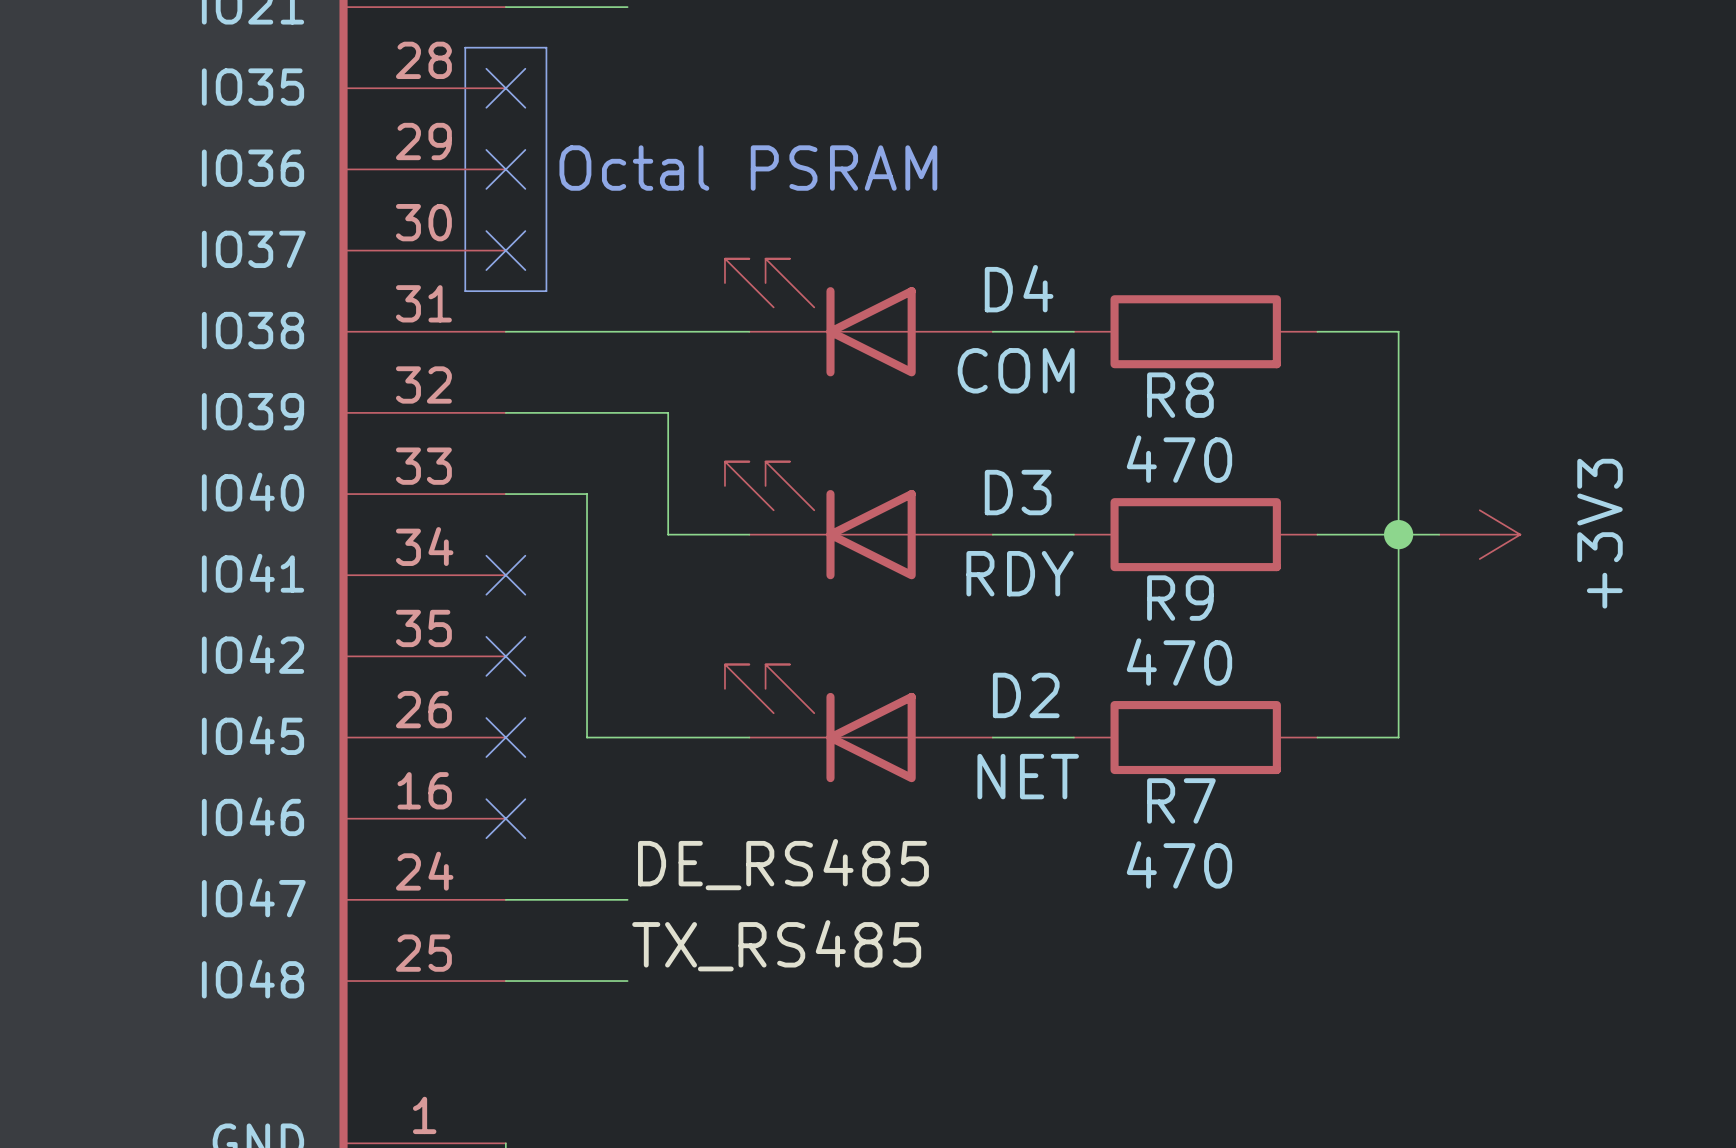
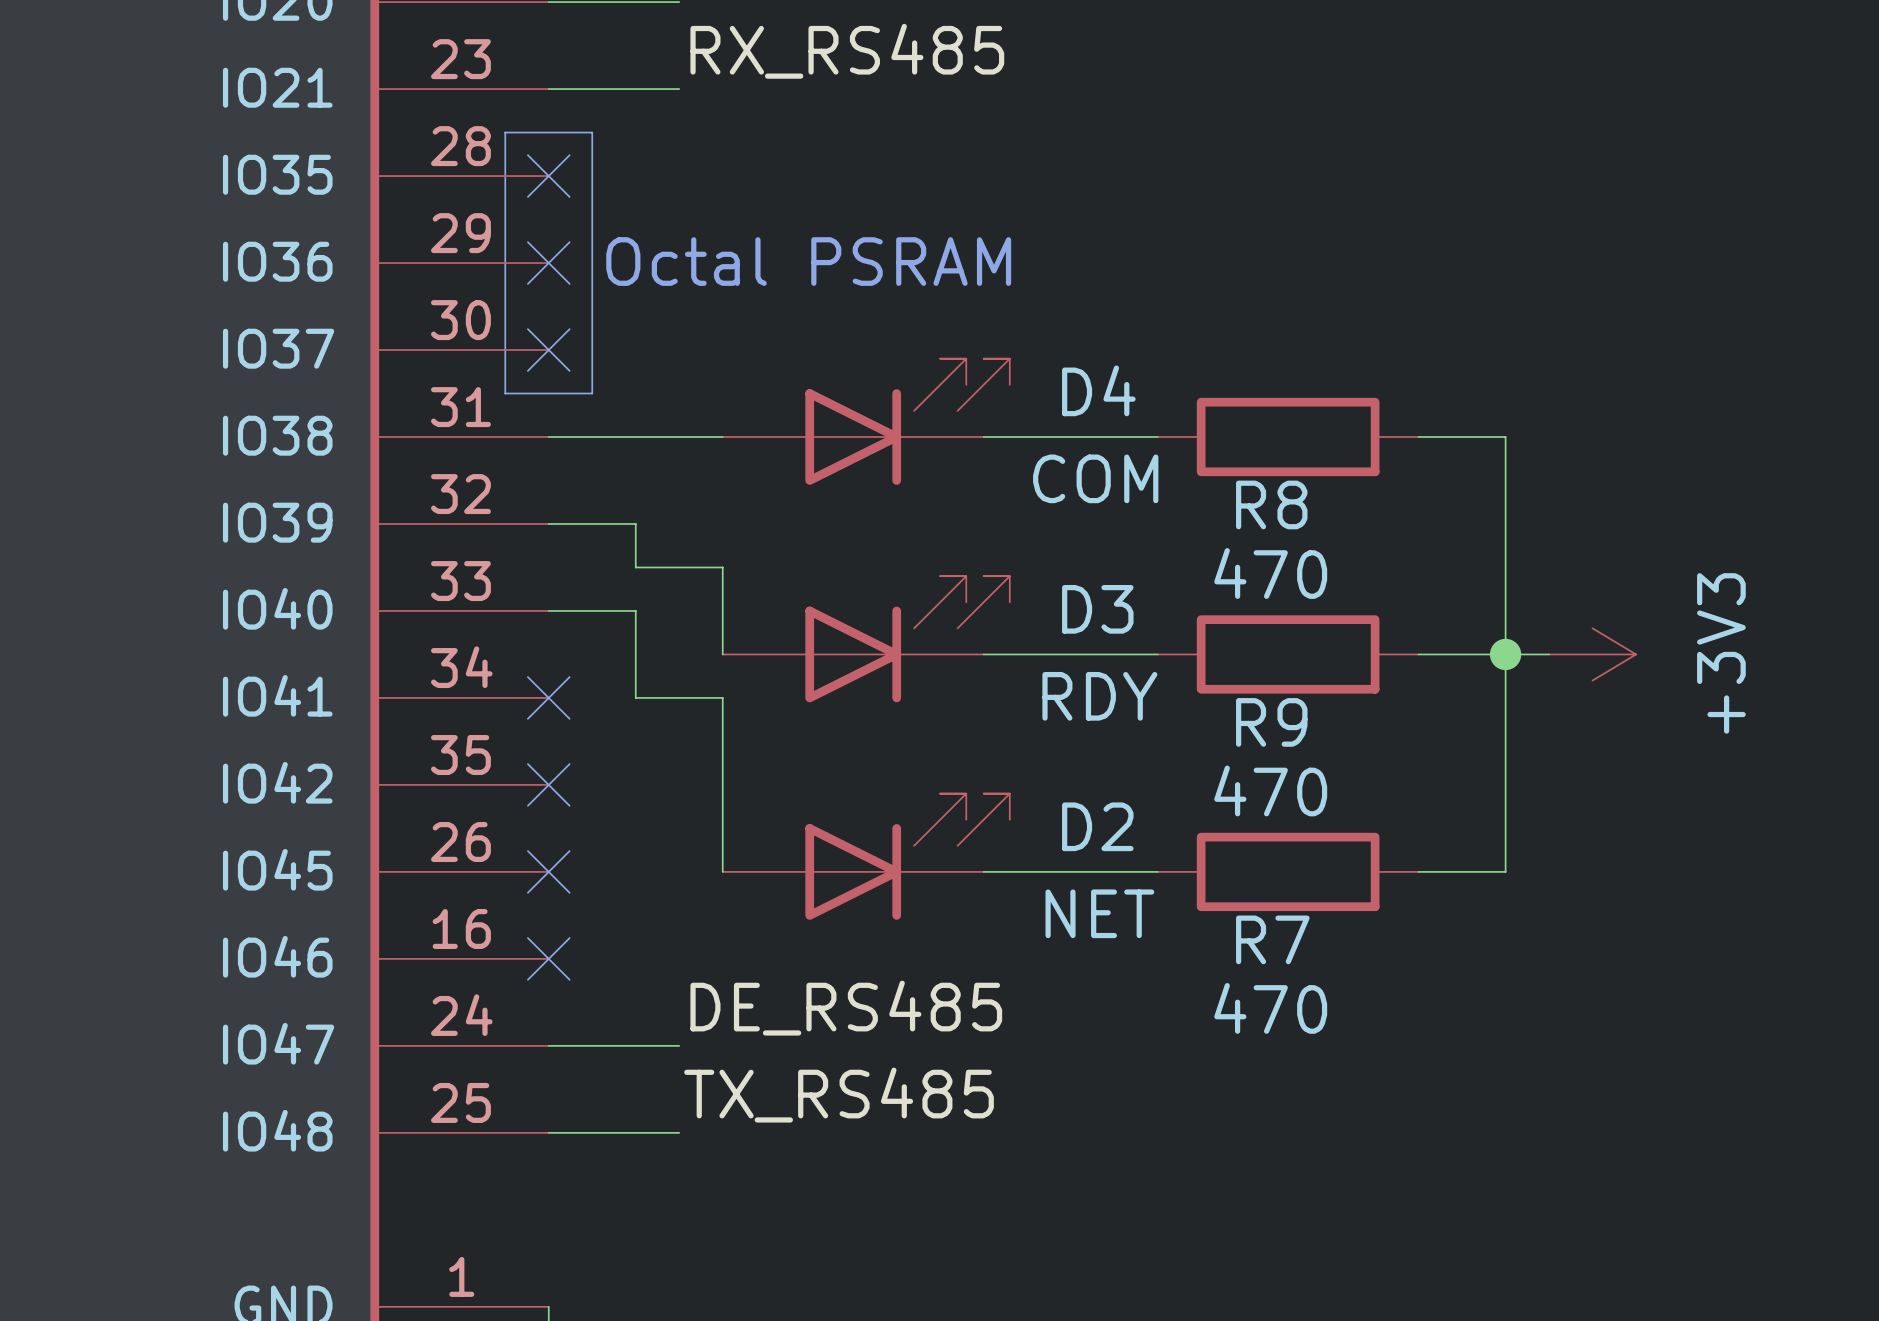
D4 flip: as is (820, 317) -> left-right (907, 421)
wire: (587, 412) (668, 412) (668, 453) -> (635, 523) (635, 567) (722, 567)
D3 flip: as is (820, 520) -> left-right (907, 639)
wire: (587, 575) (587, 737) (749, 737) -> (635, 697) (722, 697) (722, 871)
D2 flip: as is (820, 723) -> left-right (907, 856)

